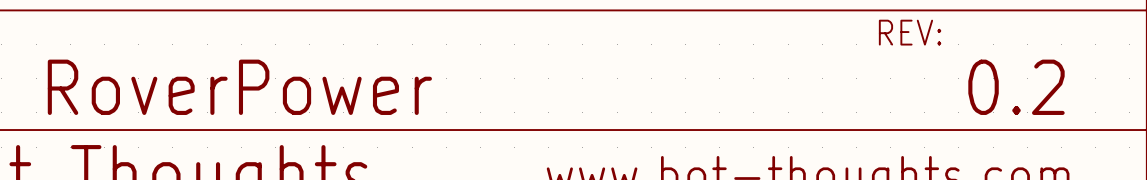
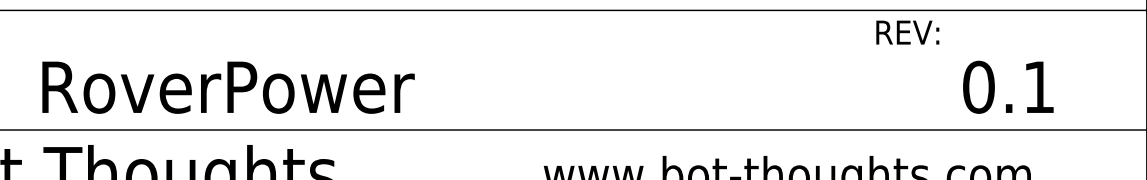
text: 0.2 (1016, 87) -> 0.1 (1008, 87)

